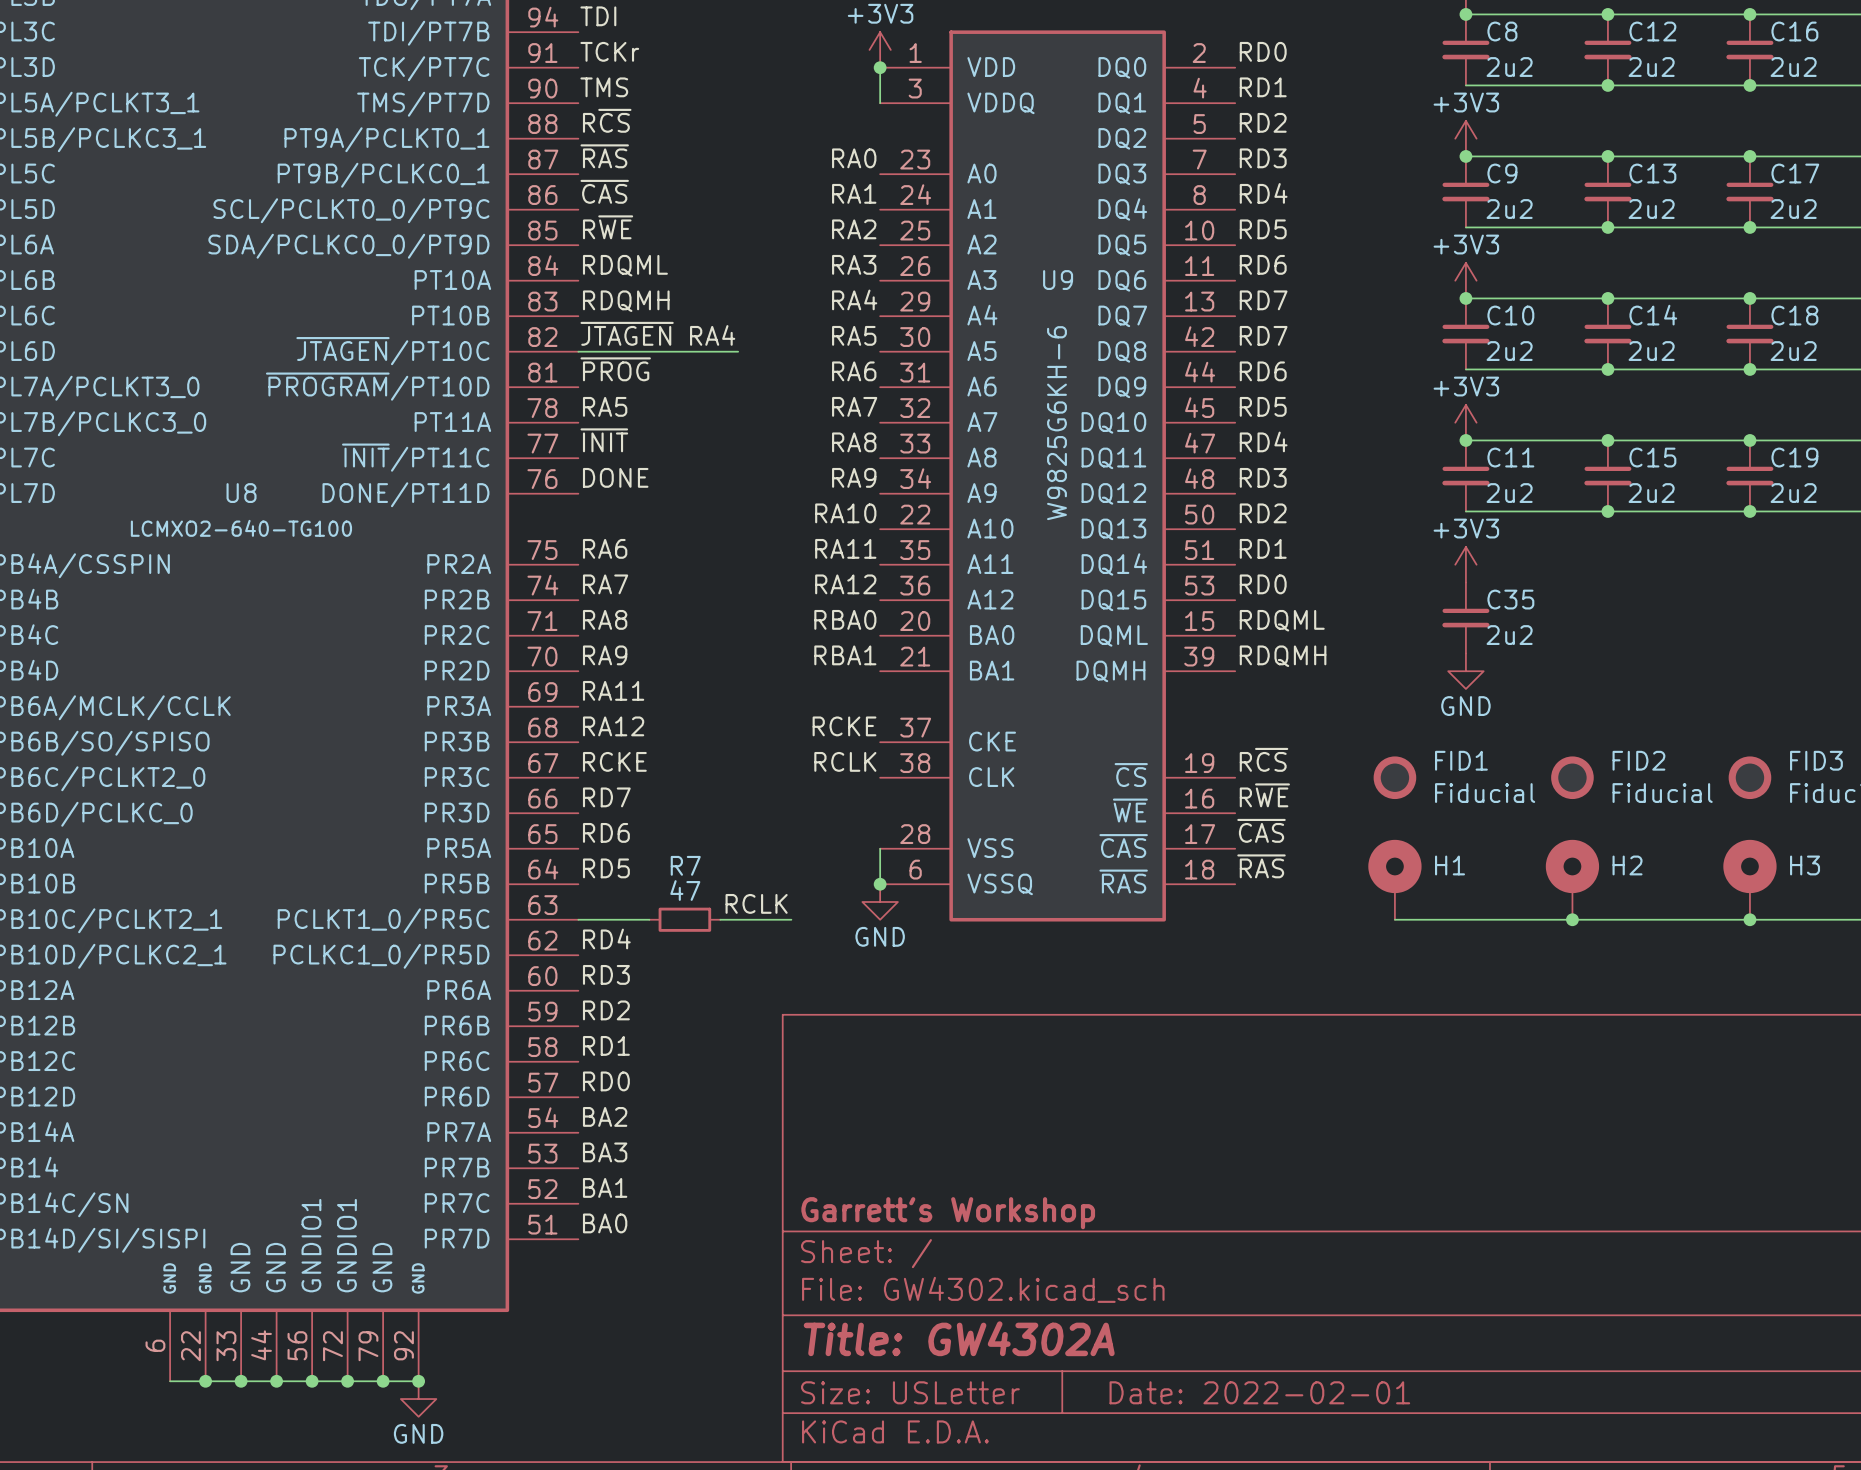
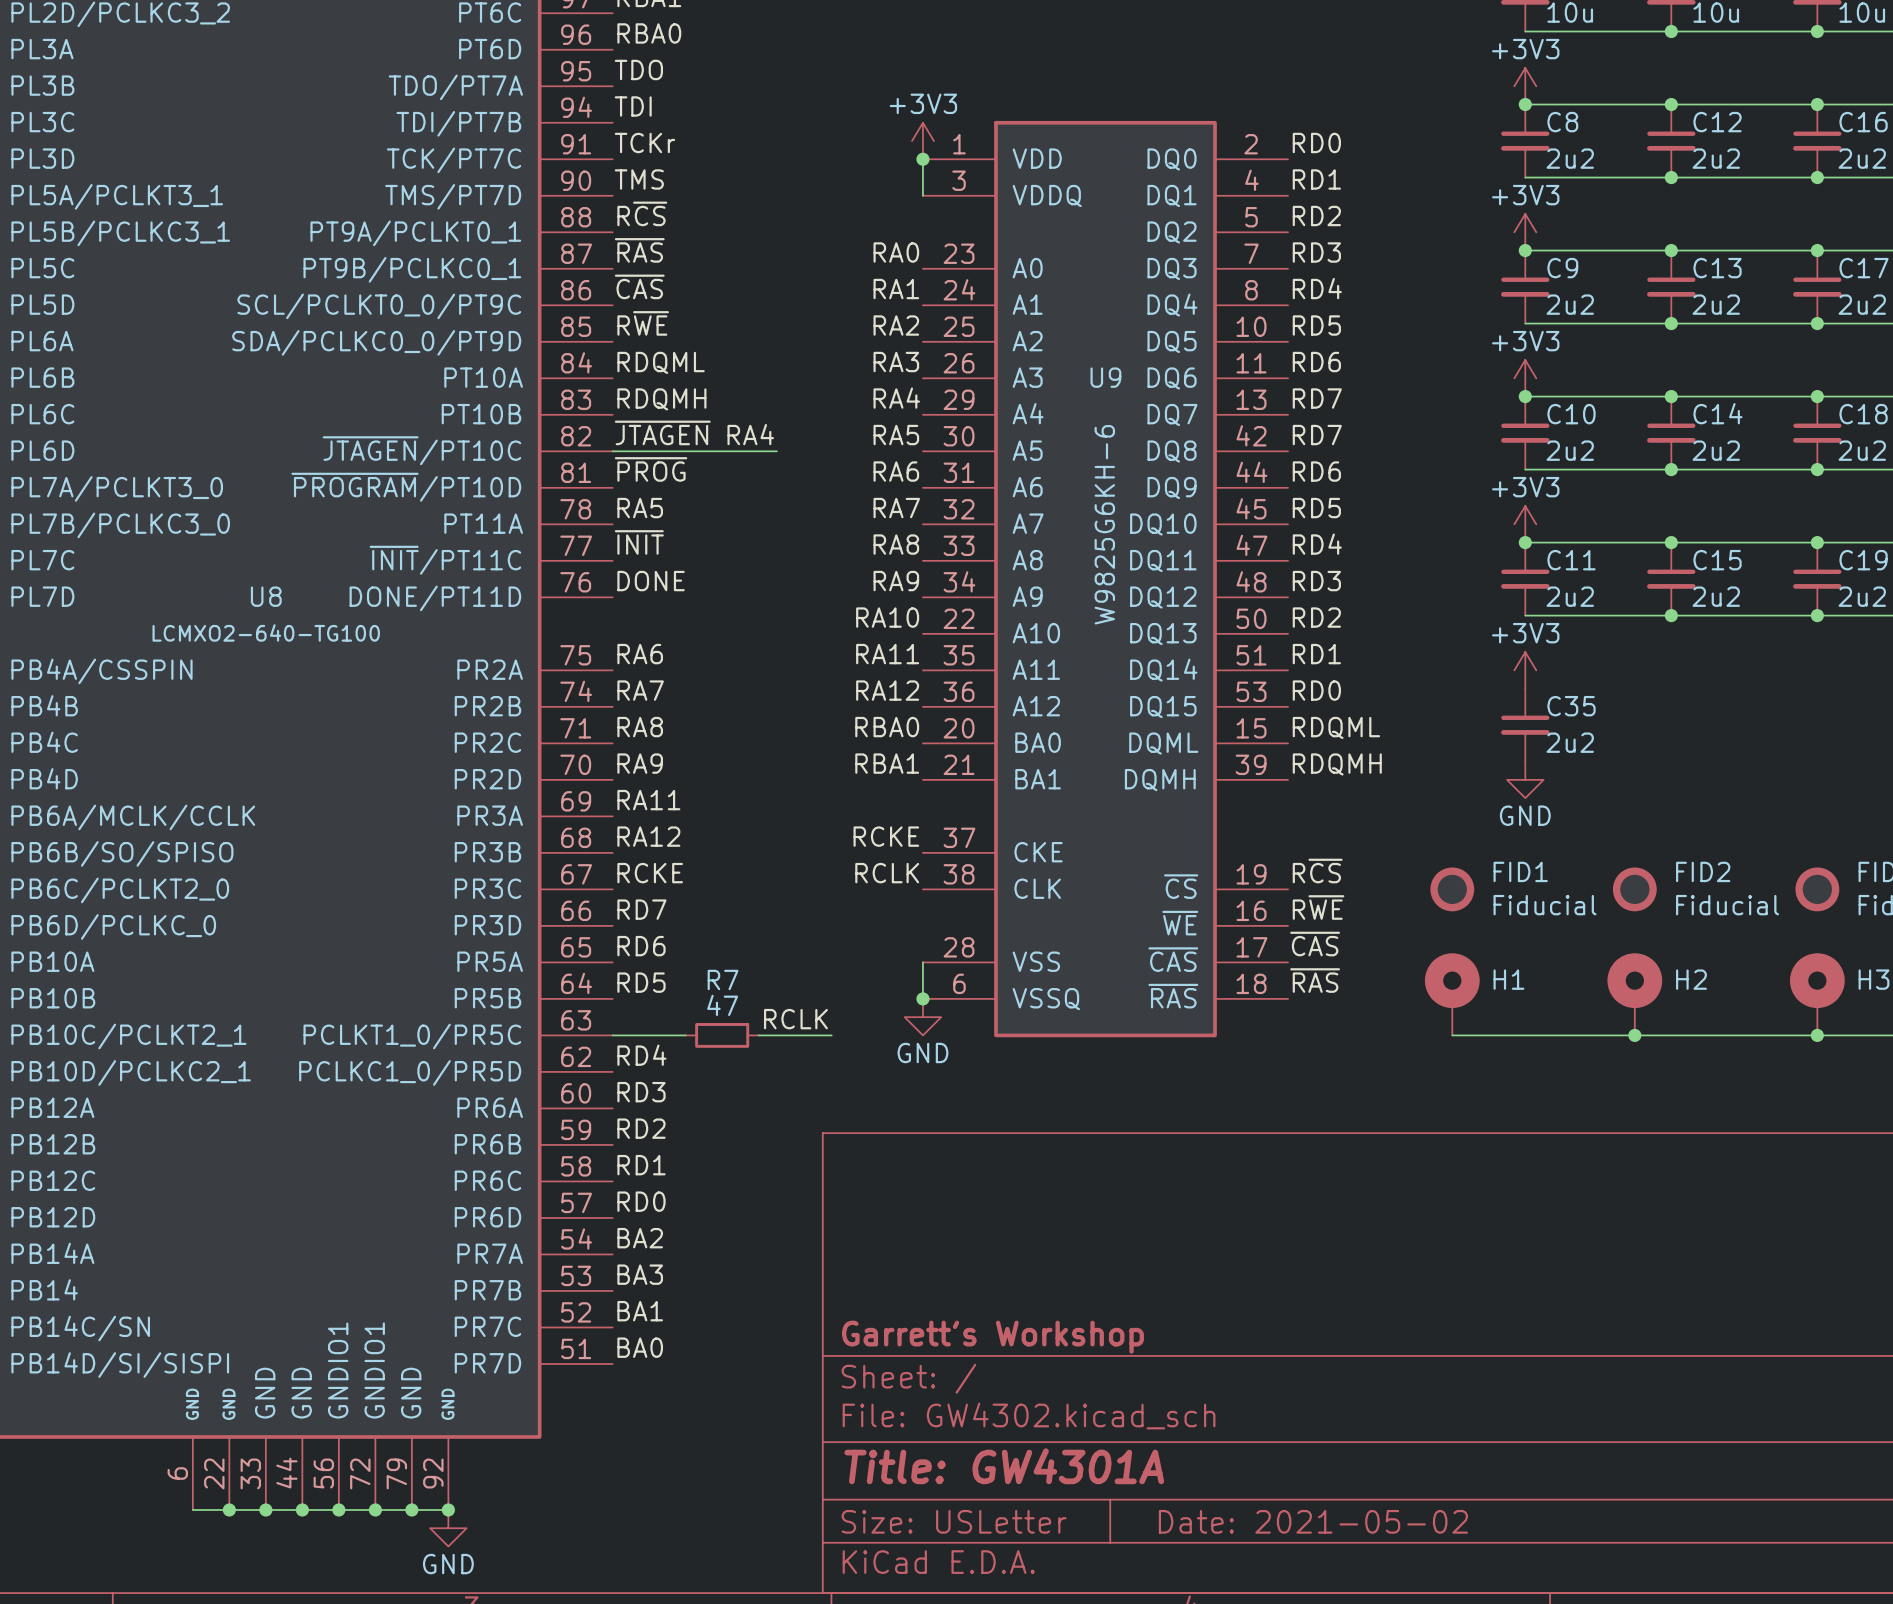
title block: Title: GW4302A (959, 1338) -> Title: GW4301A (1004, 1466)
title block: Date: 2022-02-01 (1259, 1392) -> Date: 2021-05-02 (1313, 1521)

